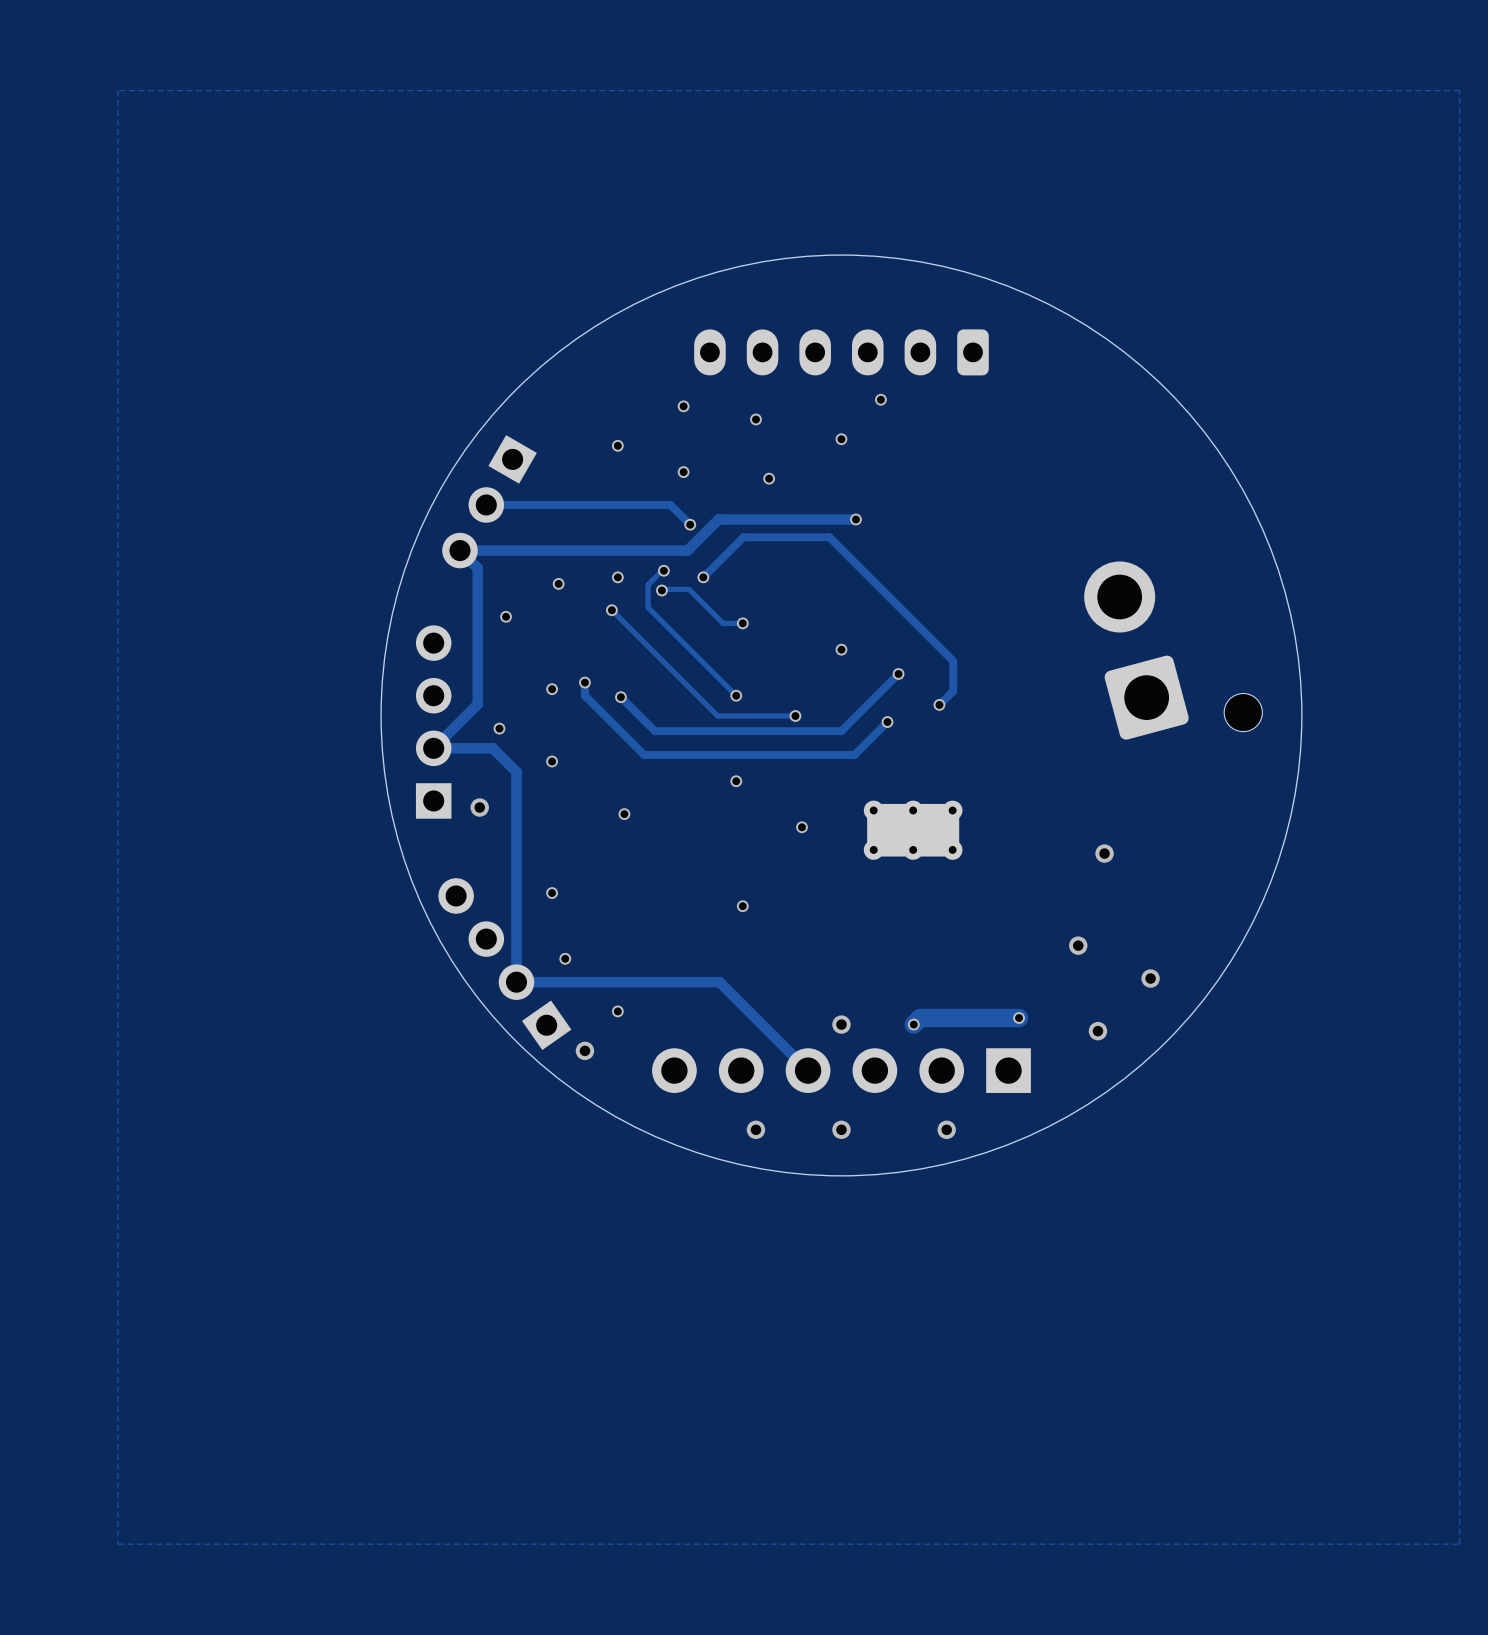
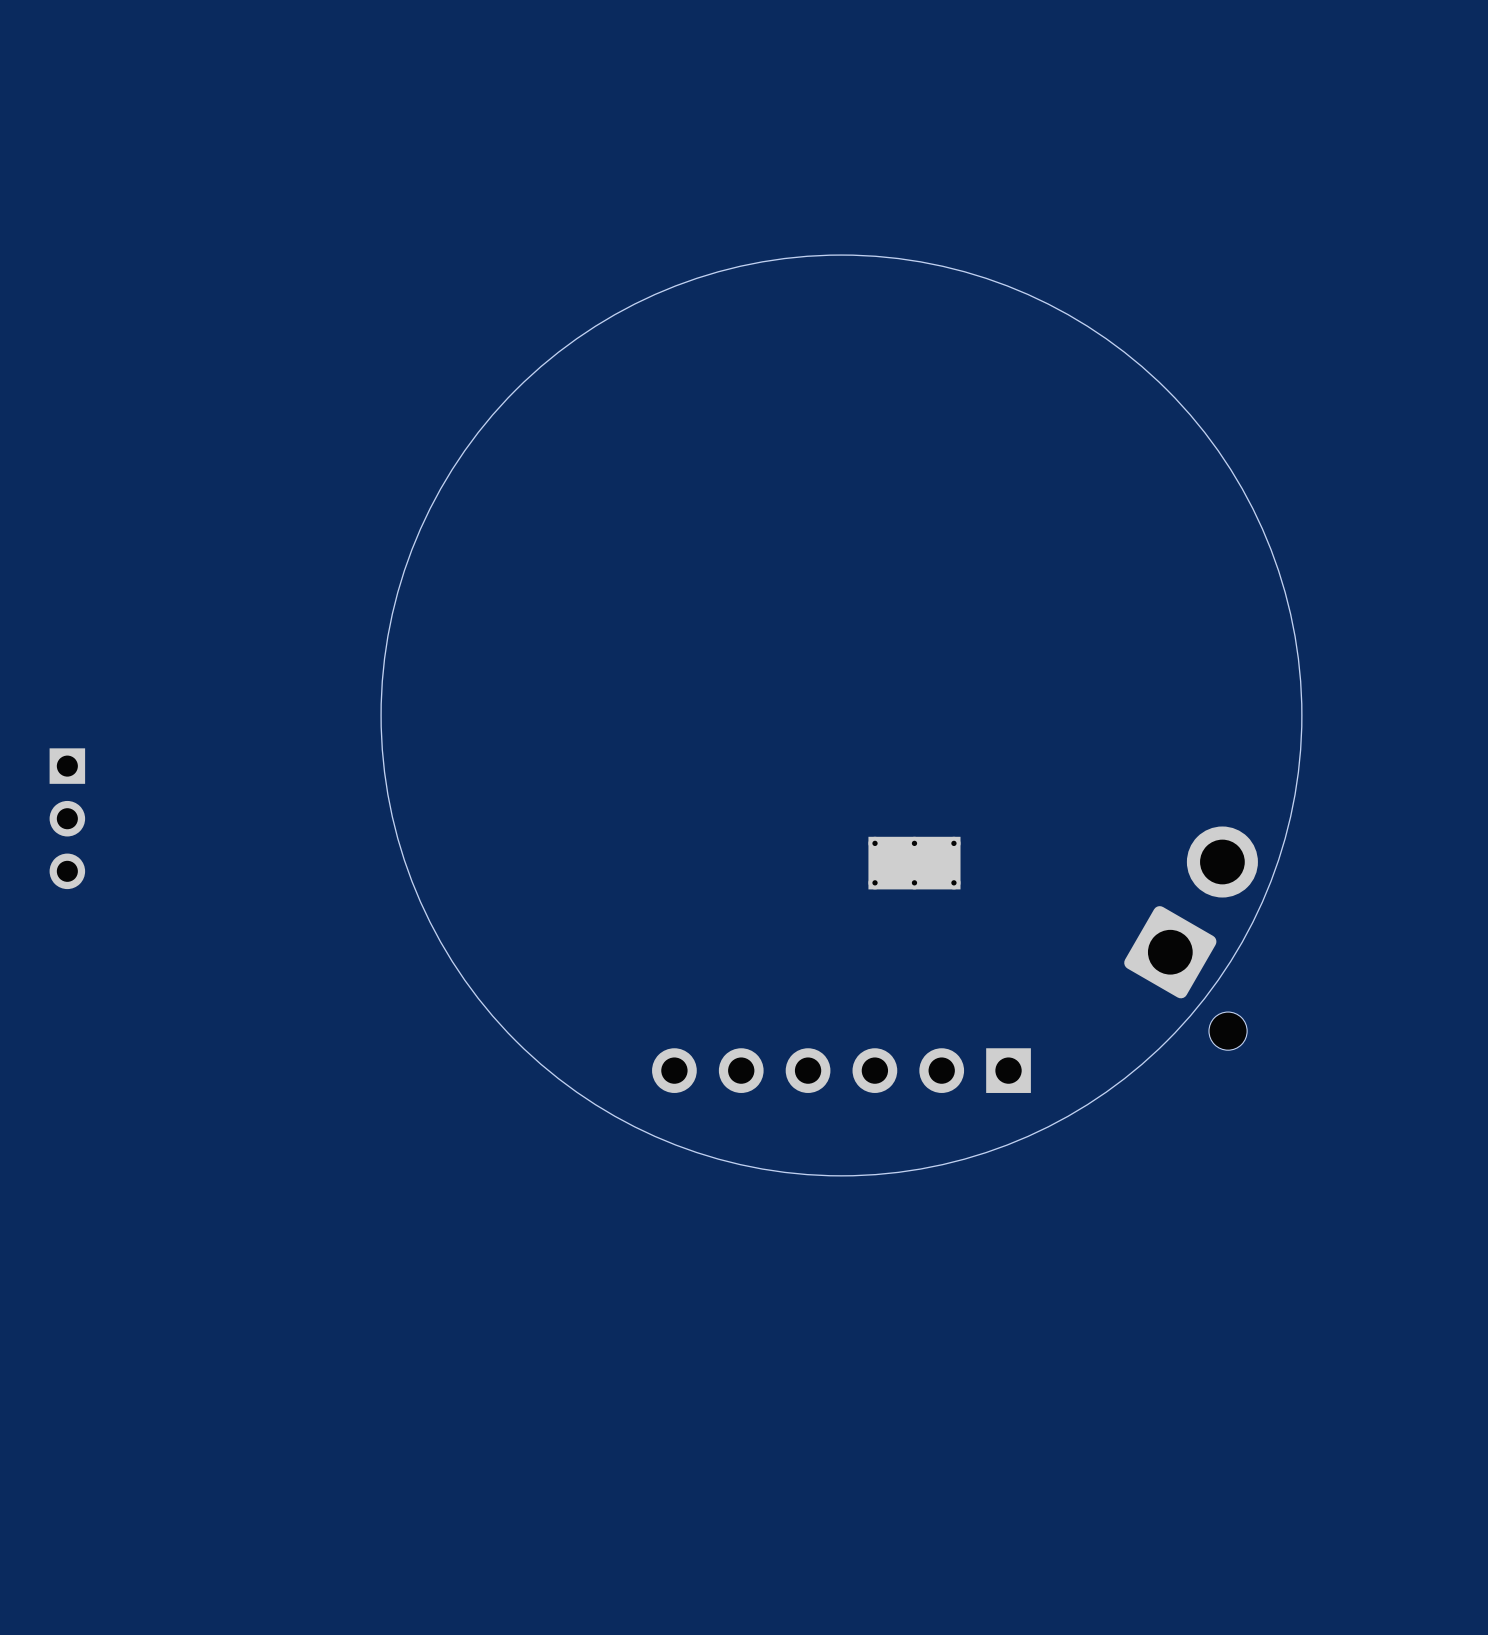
zone outline: (1459, 90) (118, 90) (118, 1544) (1459, 1544) (1459, 90) -> none
part: (841, 352) -> none
via: (880, 399) -> none
via: (683, 406) -> none
via: (755, 419) -> none
via: (841, 439) -> none
via: (617, 445) -> none
via: (683, 472) -> none
via: (769, 478) -> none
part: (489, 501) -> none
track: (486, 504) (670, 504) (690, 524) -> none
track: (855, 519) (718, 519) (687, 550) (460, 550) (477, 568) (477, 704) (433, 748) (492, 748) (516, 771) (516, 982) (719, 982) (808, 1070) -> none
via: (855, 519) -> none
via: (690, 524) -> none
track: (663, 570) (648, 584) (648, 607) (736, 695) -> none
via: (663, 570) -> none
via: (617, 577) -> none
track: (703, 577) (743, 537) (829, 537) (953, 661) (953, 691) (939, 704) -> none
via: (703, 577) -> none
via: (558, 583) -> none
track: (661, 590) (689, 589) (723, 623) (742, 623) -> none
via: (661, 590) -> none
track: (611, 610) (717, 716) (795, 716) -> none
via: (611, 610) -> none
via: (506, 616) -> none
via: (742, 623) -> none
via: (841, 649) -> none
part: (1173, 650) -> none
track: (898, 674) (841, 731) (654, 731) (620, 697) -> none
via: (898, 674) -> none
track: (584, 682) (584, 695) (644, 754) (854, 754) (887, 722) -> none
via: (584, 682) -> none
via: (552, 689) -> none
via: (736, 695) -> none
via: (620, 697) -> none
via: (939, 704) -> none
via: (795, 716) -> none
part: (433, 722) -> none
via: (887, 722) -> none
via: (499, 728) -> none
via: (552, 761) -> none
via: (736, 781) -> none
via: (479, 807) -> none
via: (624, 814) -> none
part: none -> (67, 818)
via: (802, 827) -> none
part: (913, 830) -> none
via: (1104, 853) -> none
part: none -> (914, 863)
via: (552, 893) -> none
via: (742, 906) -> none
part: none -> (1191, 938)
via: (1078, 945) -> none
via: (565, 958) -> none
part: (504, 964) -> none
via: (1150, 978) -> none
via: (617, 1011) -> none
track: (1019, 1018) (920, 1018) (913, 1024) -> none
via: (1019, 1018) -> none
via: (841, 1024) -> none
via: (913, 1024) -> none
via: (1097, 1031) -> none
via: (584, 1050) -> none
via: (755, 1129) -> none
via: (841, 1129) -> none
via: (946, 1129) -> none

